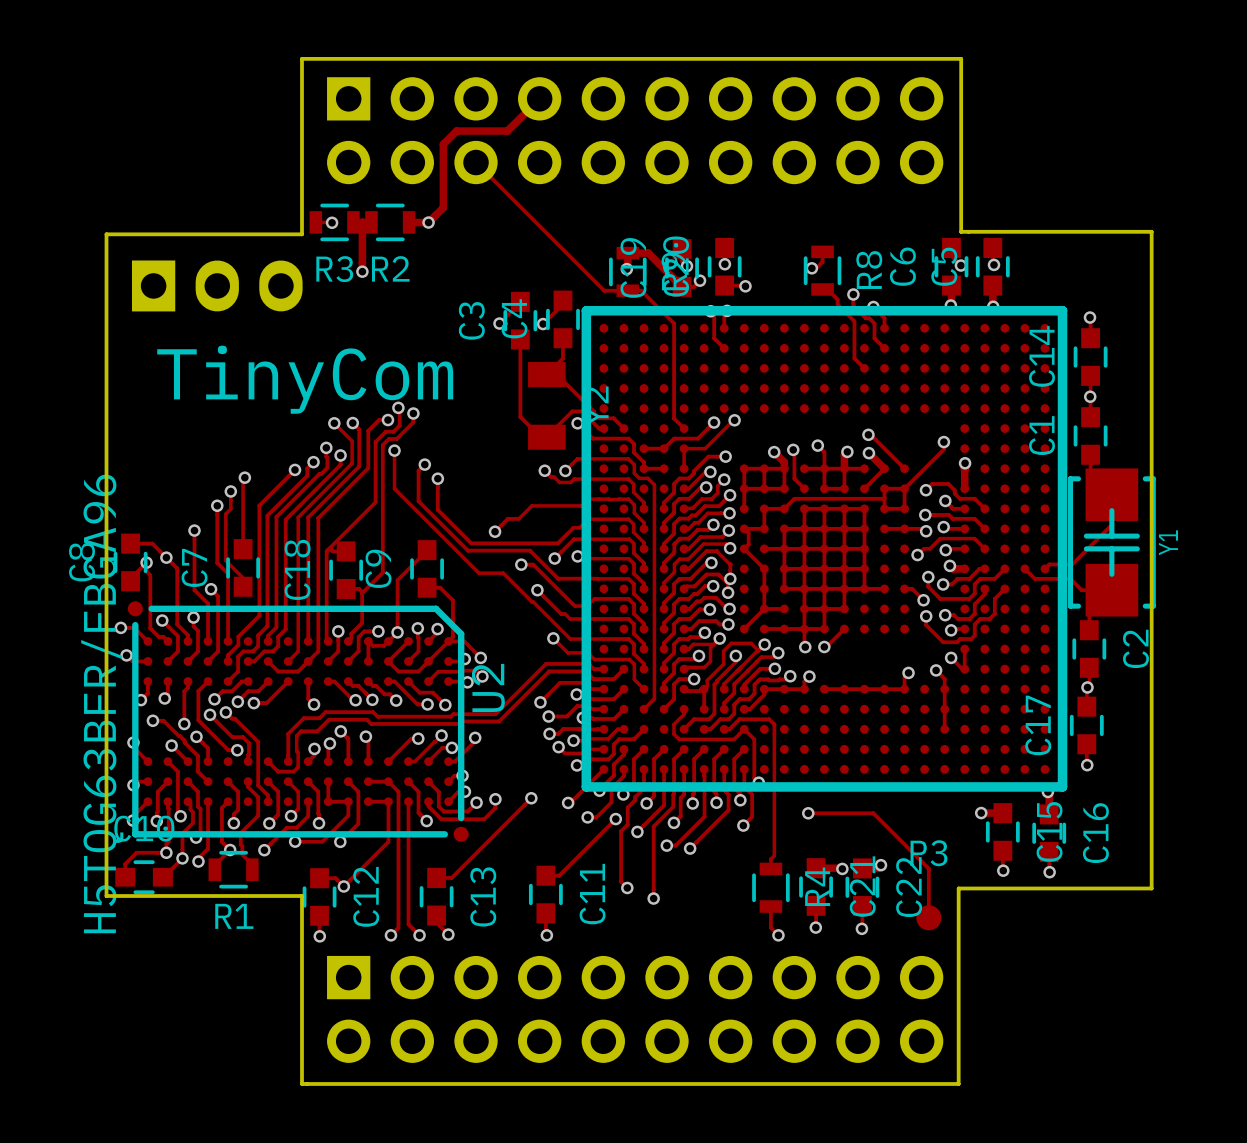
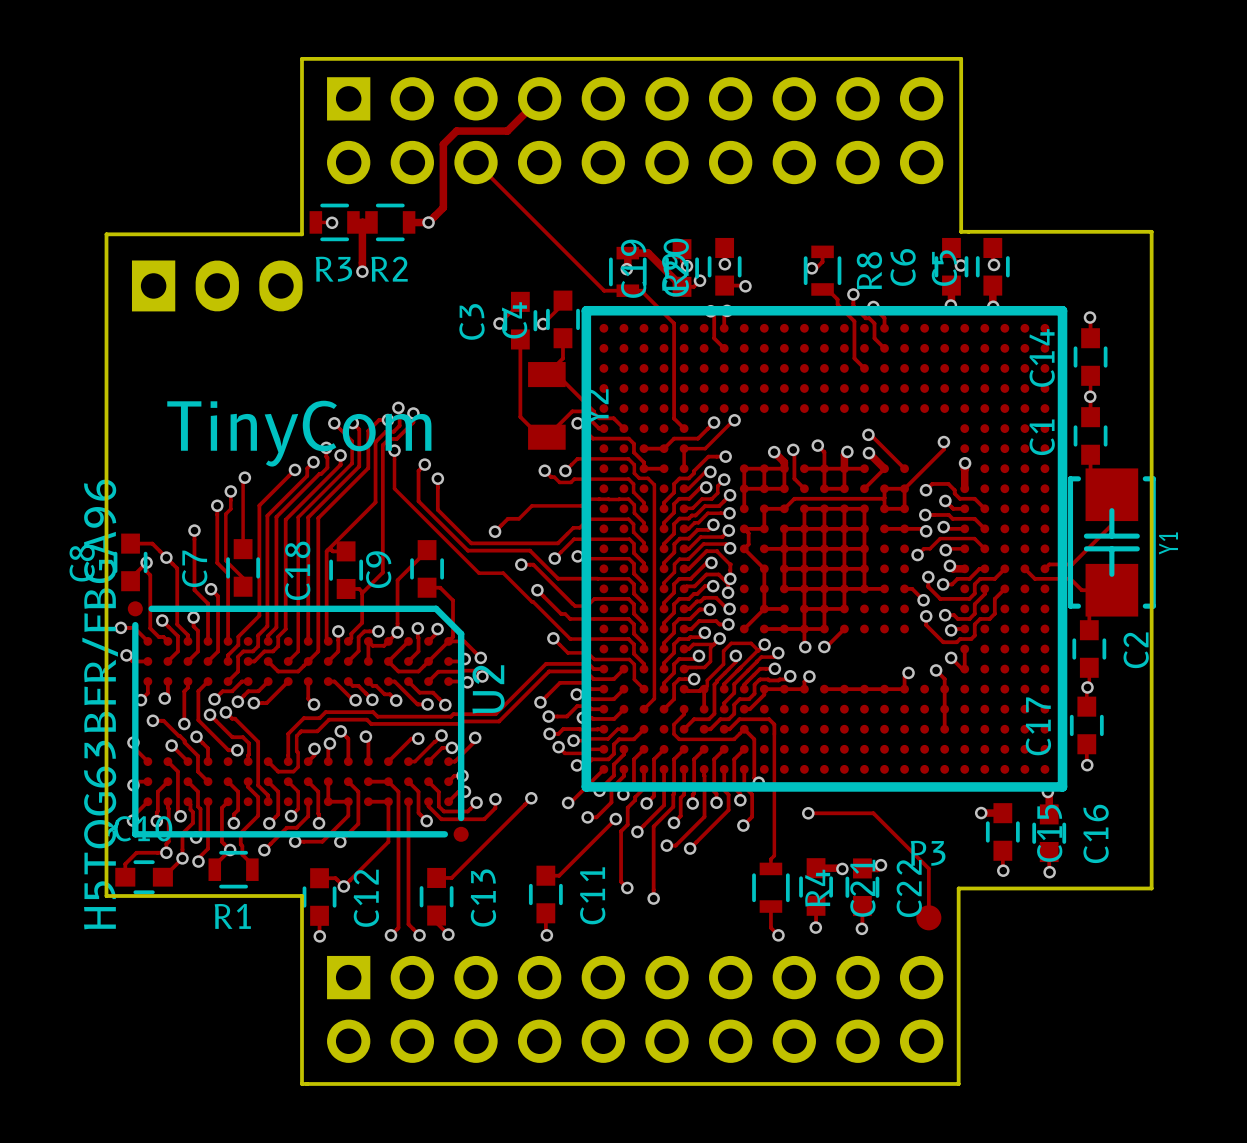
text position: TinyCom (305, 379) -> TinyCom (299, 433)

